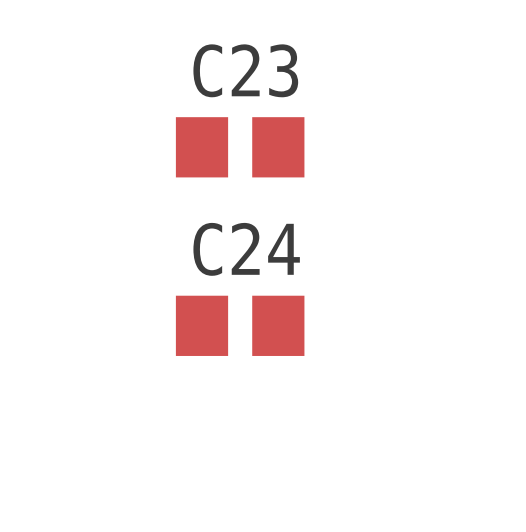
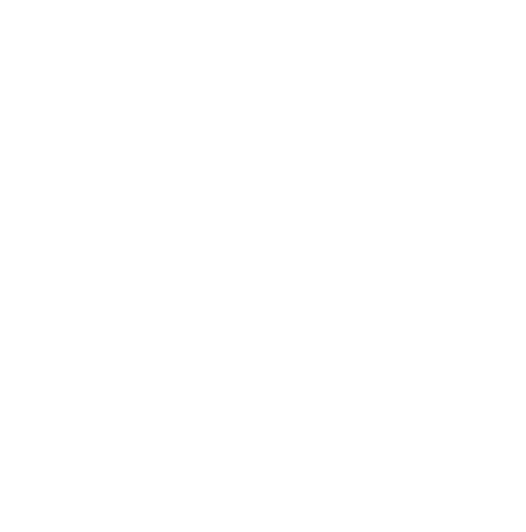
C23: (240, 147) -> none
C24: (240, 325) -> none

